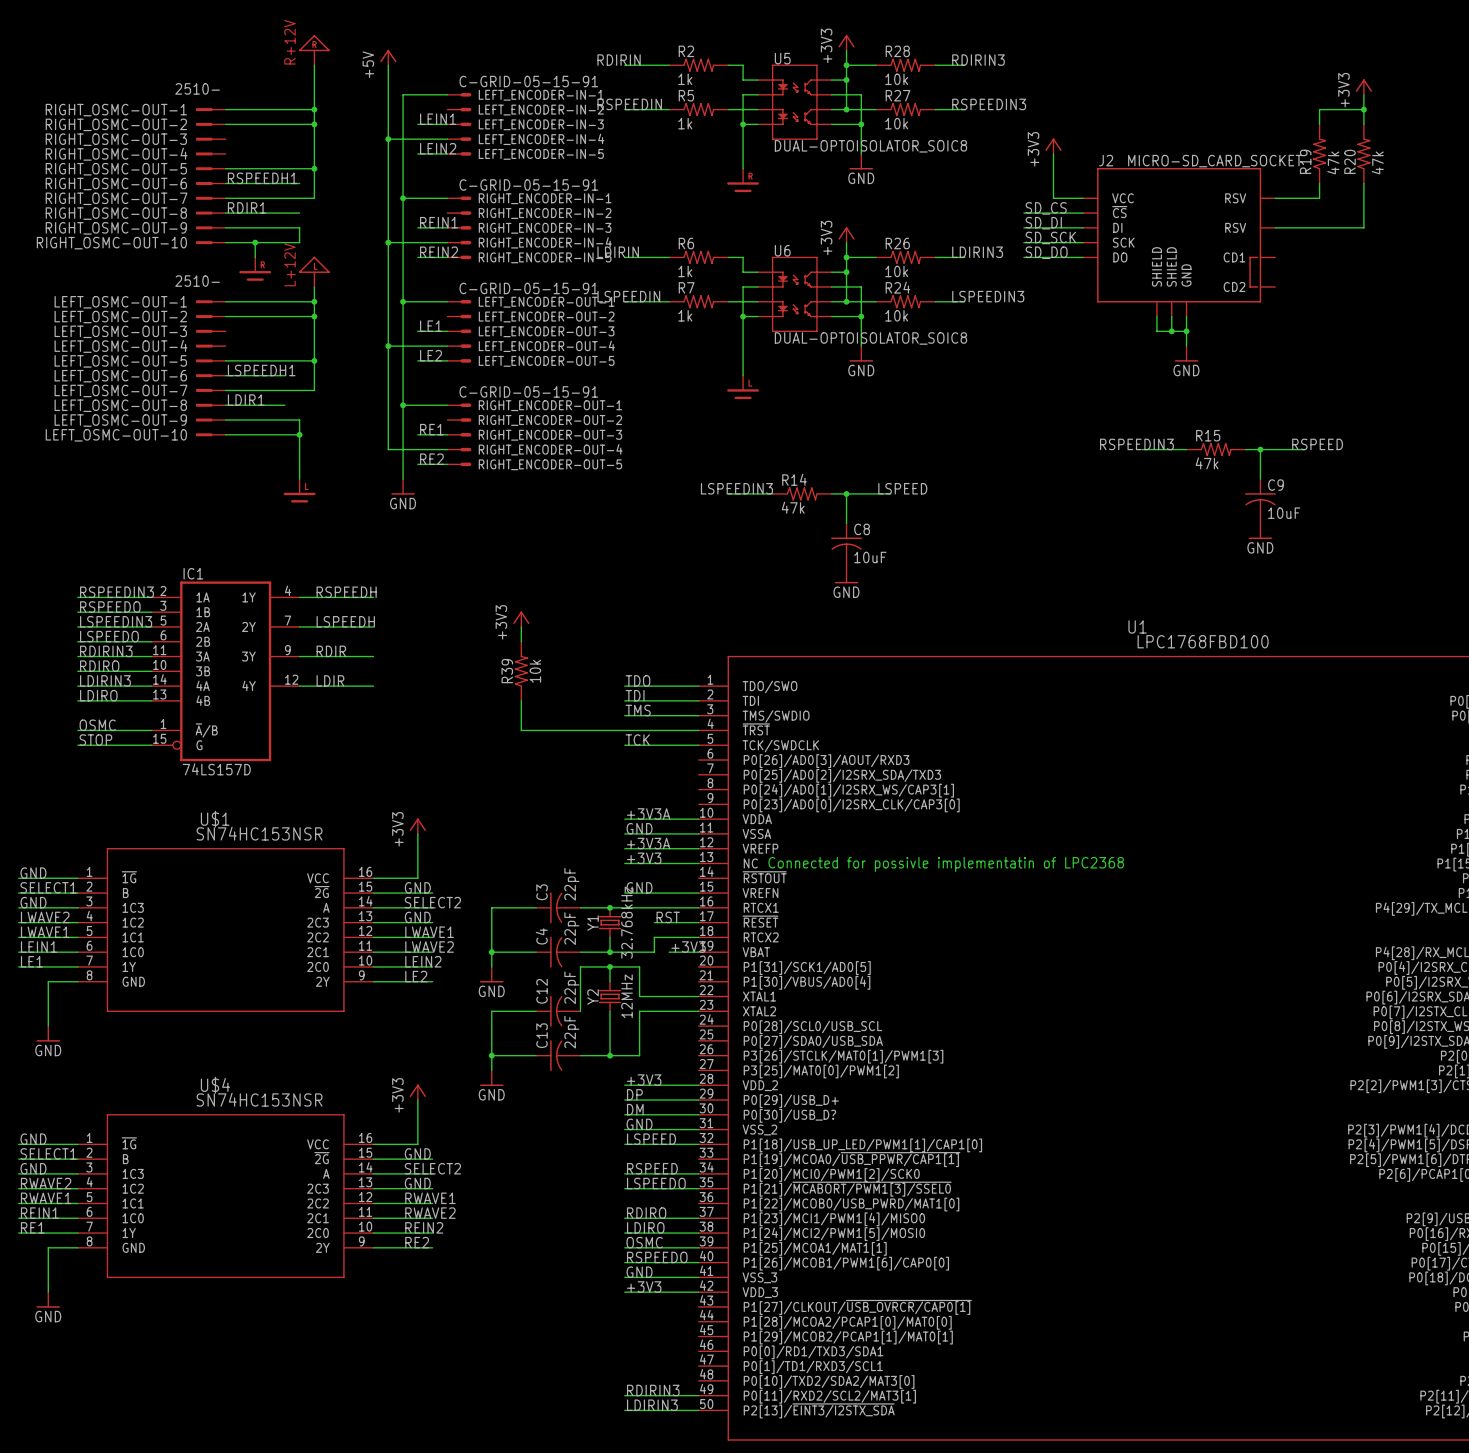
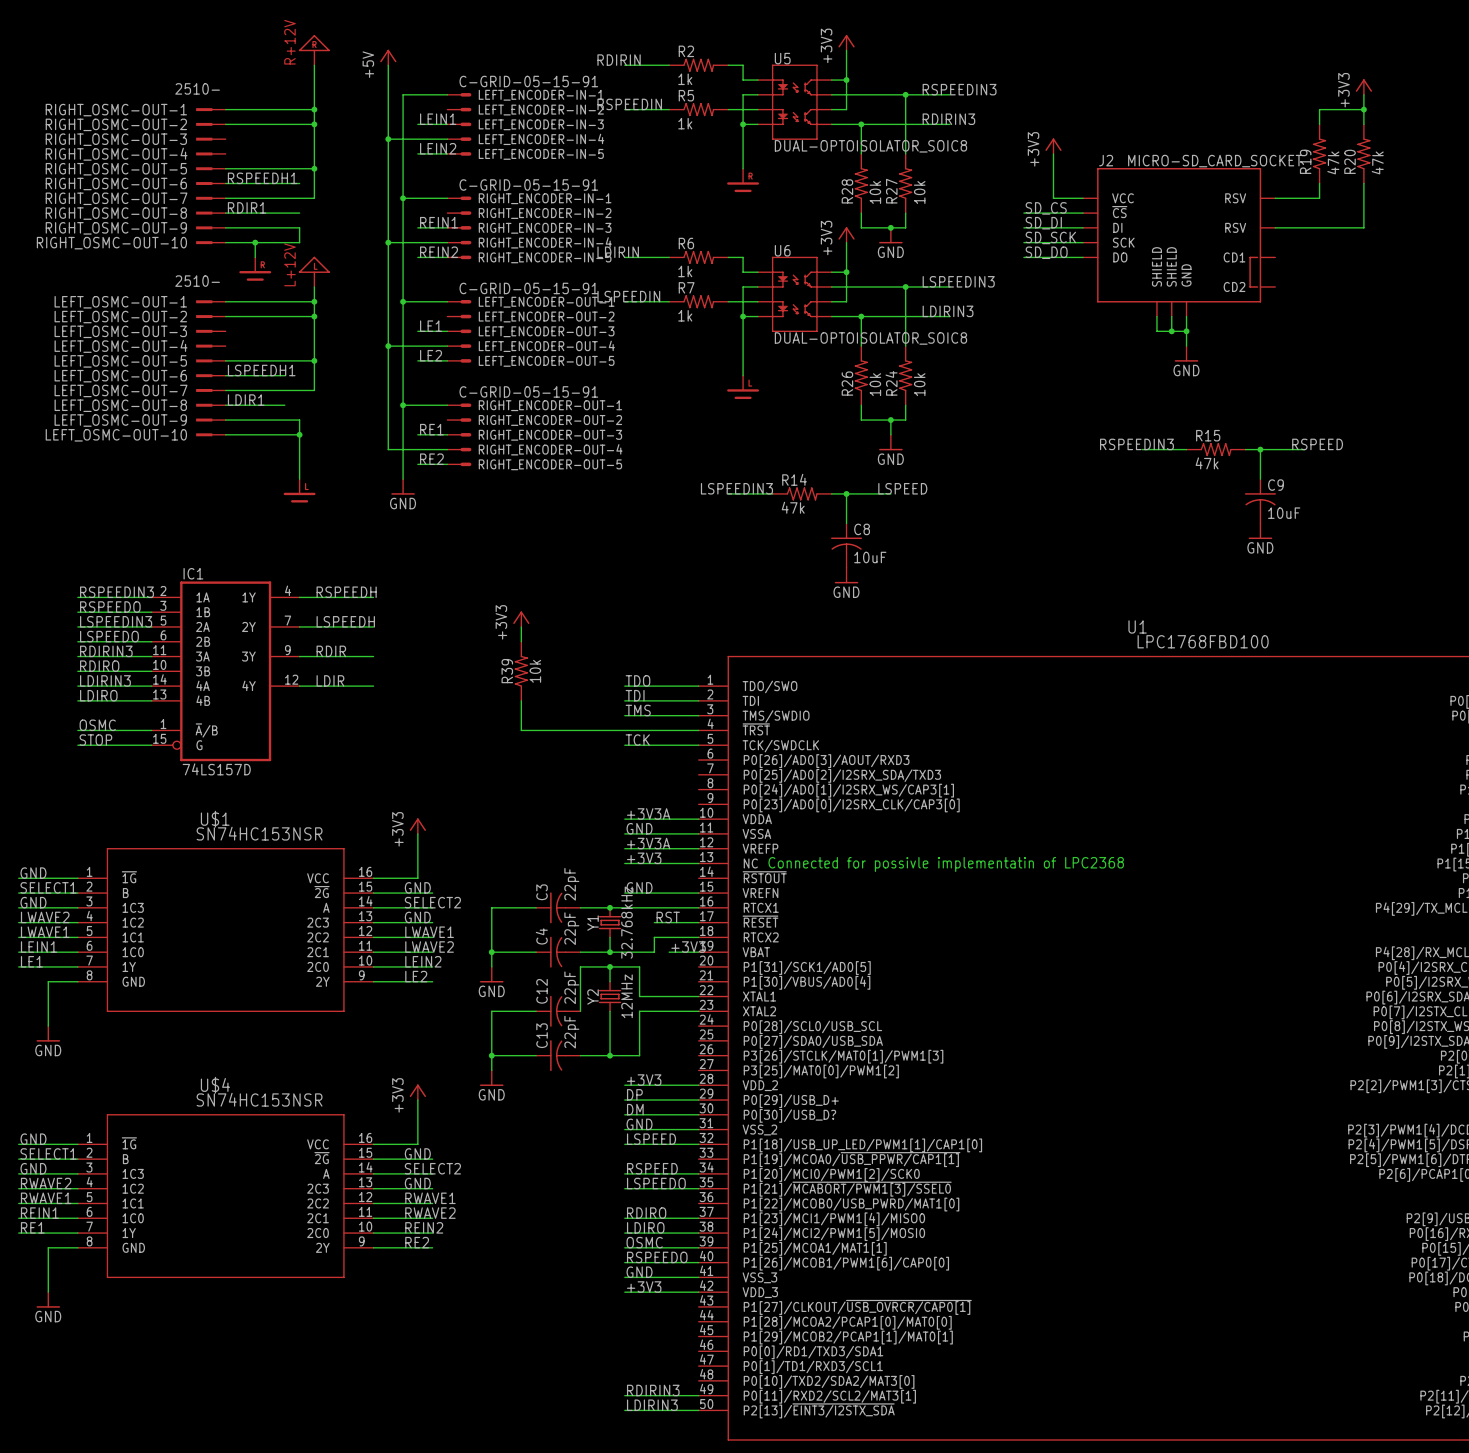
label position: RDIRIN3 (978, 60) -> RDIRIN3 (948, 119)
wire: (846, 65) (876, 65) -> none
junction: (846, 65) -> none
R28 rotation: 0° (905, 65) -> 90° counterclockwise (861, 183)
R28 position: (905, 65) -> (861, 183)
wire: (935, 65) (964, 65) -> none
wire: (861, 94) (861, 124) -> (861, 94) (950, 94)
wire: none -> (905, 94) (905, 153)
junction: none -> (905, 94)
label position: RSPEEDIN3 (989, 104) -> RSPEEDIN3 (959, 89)
wire: (846, 109) (876, 109) -> none
junction: (846, 109) -> none
R27 rotation: 0° (905, 109) -> 90° counterclockwise (905, 183)
R27 position: (905, 109) -> (905, 183)
wire: (935, 109) (964, 109) -> none
wire: none -> (861, 124) (950, 124)
power symbol: GND (861, 161) -> none
wire: none -> (861, 213) (861, 227) (905, 227) (905, 213)
junction: none -> (890, 227)
power symbol: none -> GND (890, 235)
label position: LDIRIN3 (977, 252) -> LDIRIN3 (948, 311)
wire: (846, 257) (876, 257) -> none
junction: (846, 257) -> none
R26 rotation: 0° (905, 257) -> 90° counterclockwise (861, 375)
R26 position: (905, 257) -> (861, 375)
wire: (935, 257) (964, 257) -> none
wire: (861, 286) (861, 316) -> (861, 286) (950, 286)
wire: none -> (905, 286) (905, 346)
junction: none -> (905, 286)
label position: LSPEEDIN3 (988, 296) -> LSPEEDIN3 (958, 281)
wire: (846, 301) (876, 301) -> none
junction: (846, 301) -> none
R24 rotation: 0° (905, 301) -> 90° counterclockwise (905, 375)
R24 position: (905, 301) -> (905, 375)
wire: (935, 301) (964, 301) -> none
wire: none -> (861, 316) (950, 316)
power symbol: GND (861, 353) -> none
wire: none -> (861, 405) (861, 420) (905, 420) (905, 405)
wire: none -> (890, 420) (890, 434)
junction: none -> (890, 420)
power symbol: none -> GND (890, 442)

